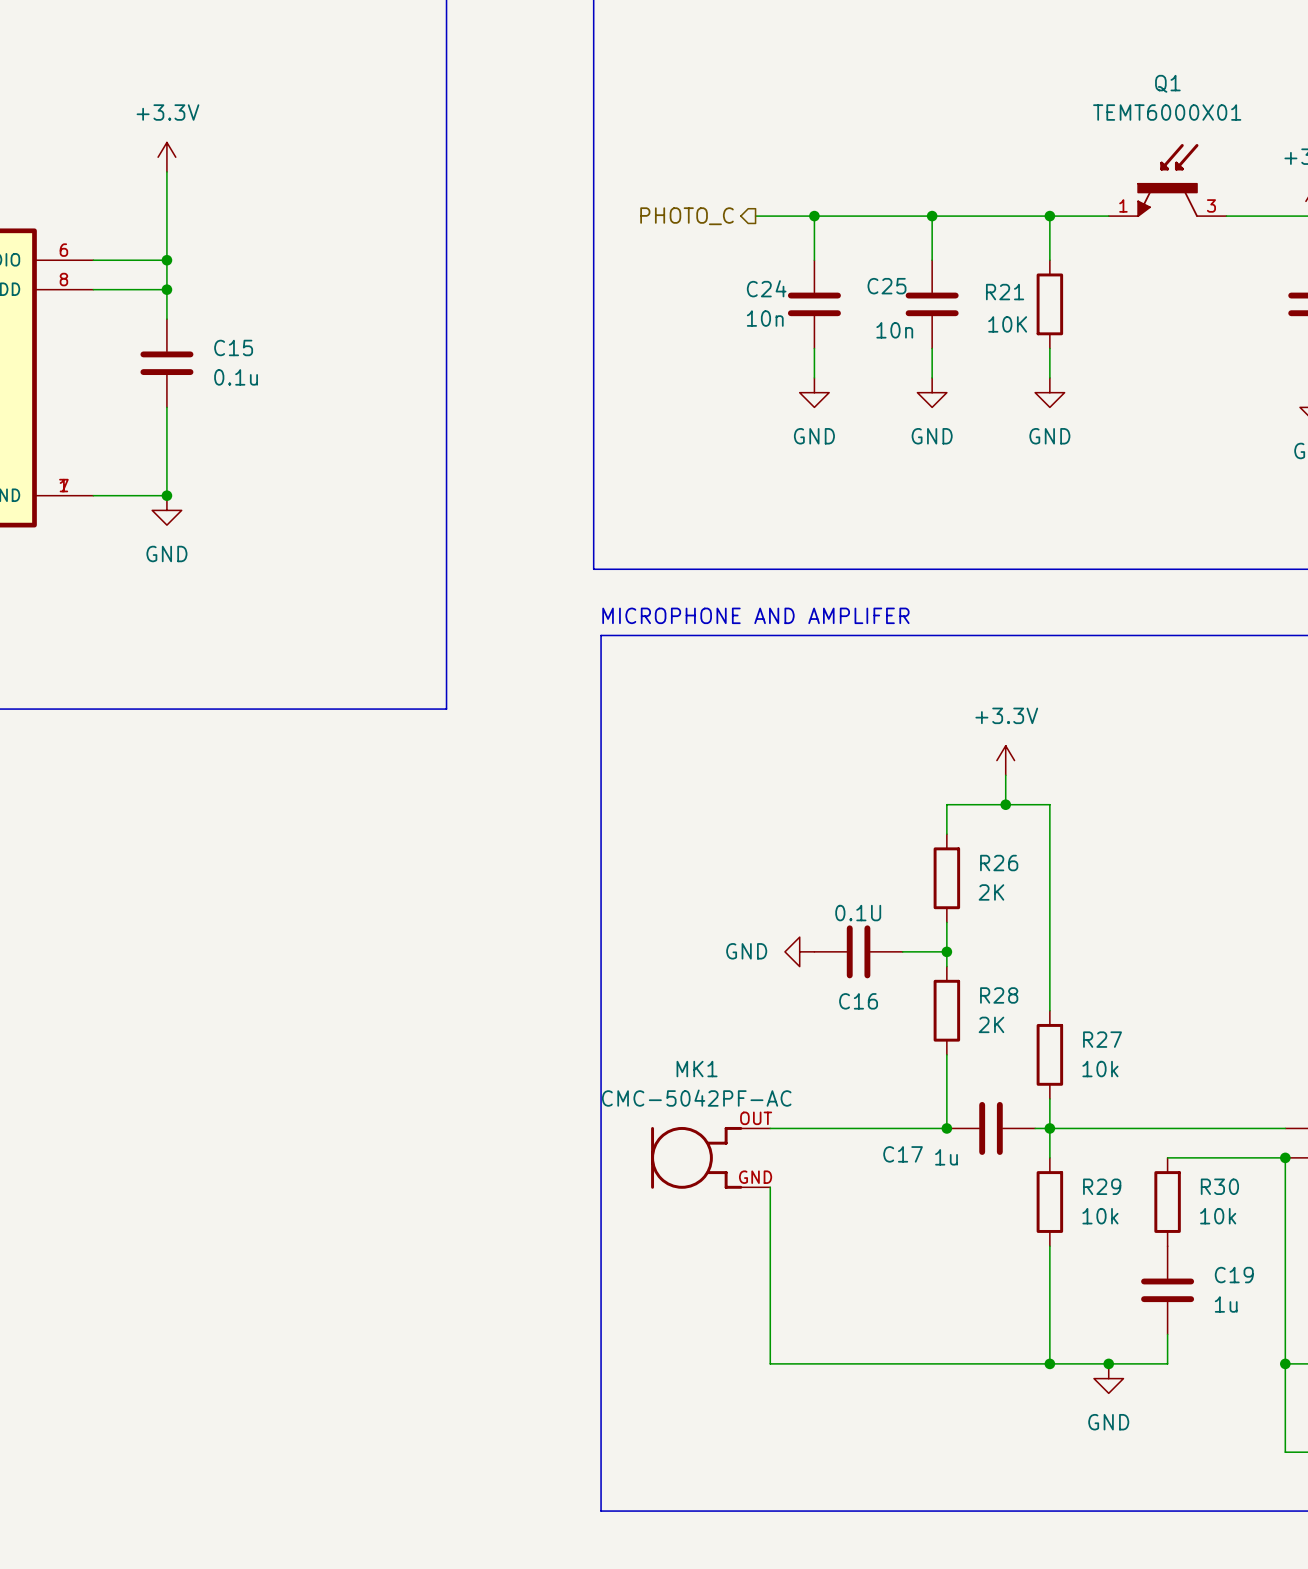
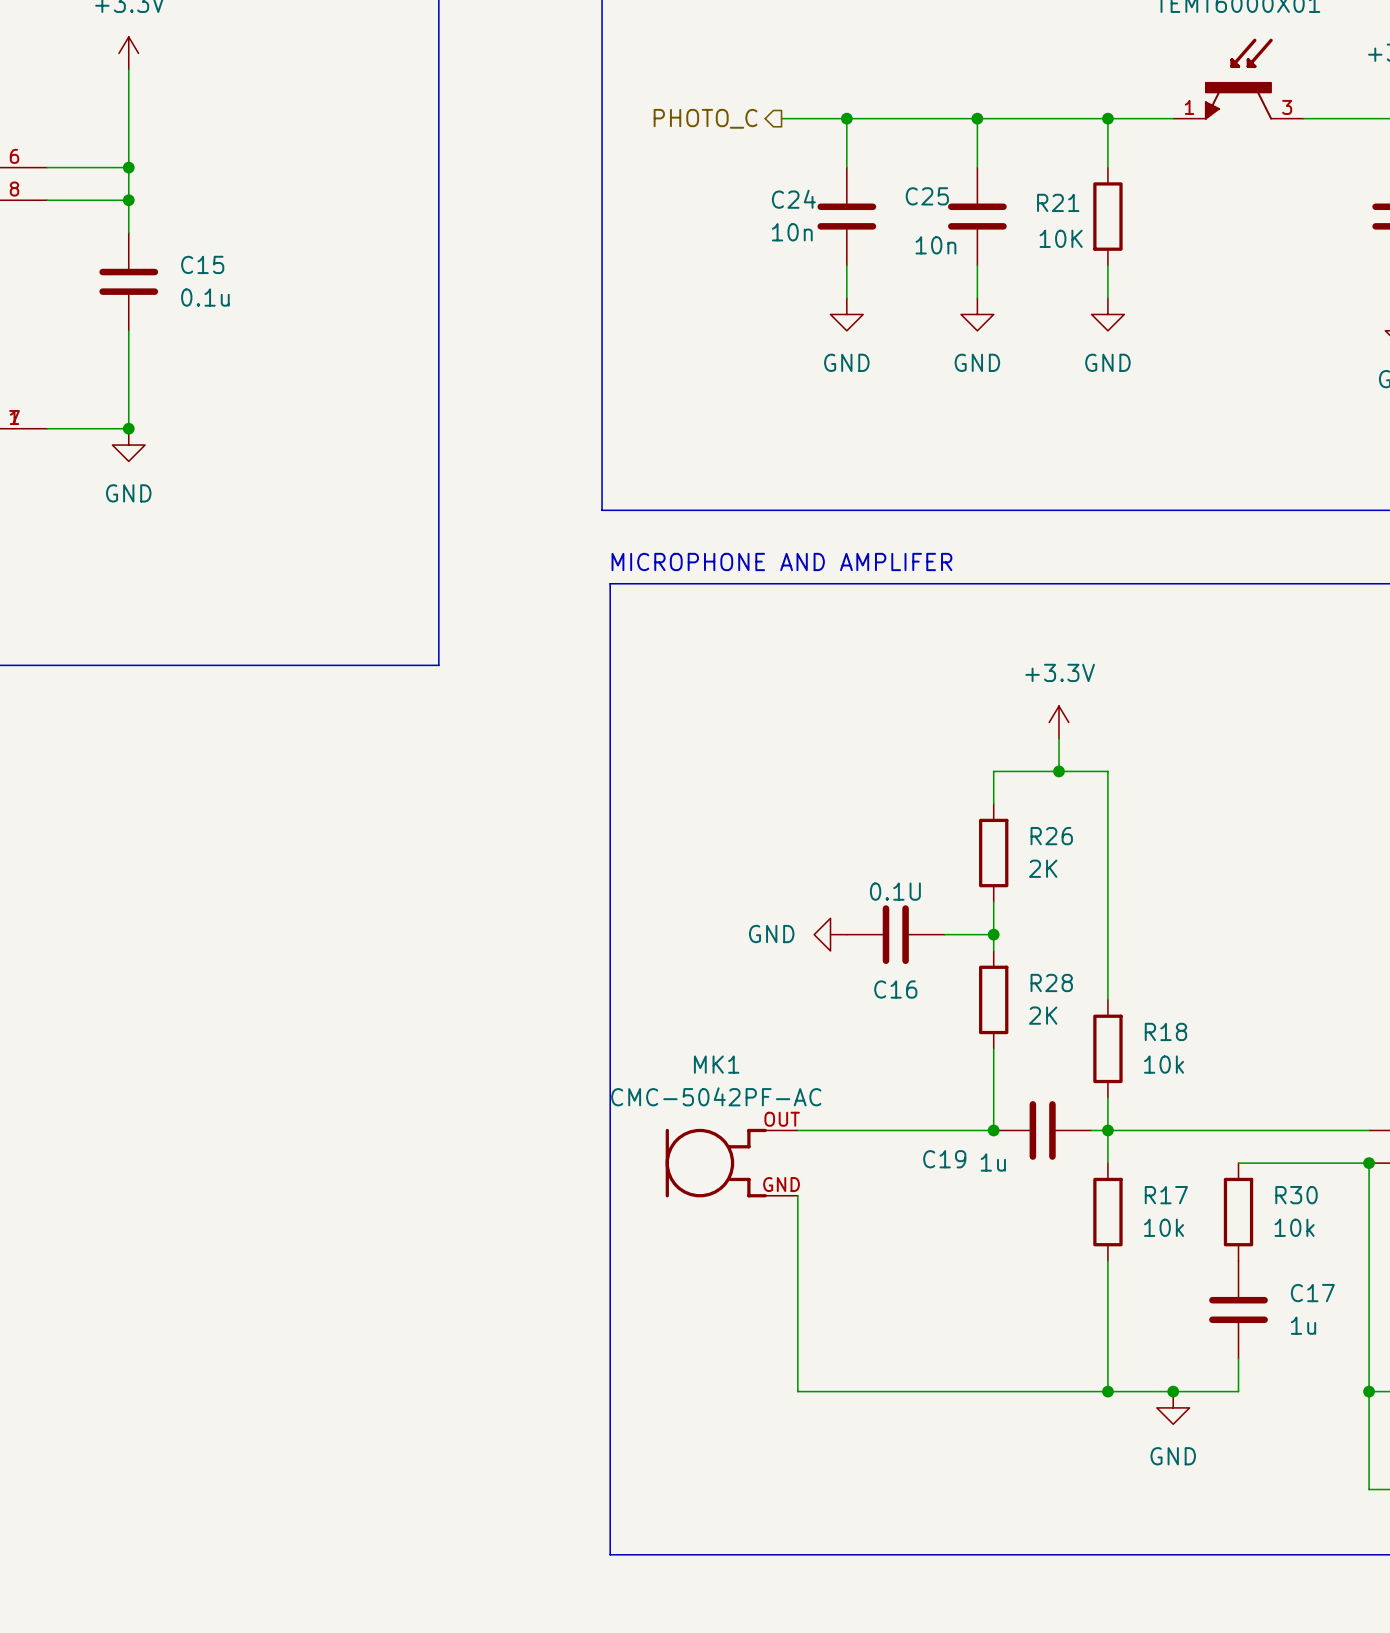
R27 name: R27 (1102, 1039) -> R18 (1165, 1031)
C17 name: C17 (903, 1154) -> C19 (944, 1159)
R29 name: R29 (1102, 1186) -> R17 (1166, 1195)
C19 name: C19 (1234, 1275) -> C17 (1312, 1293)

